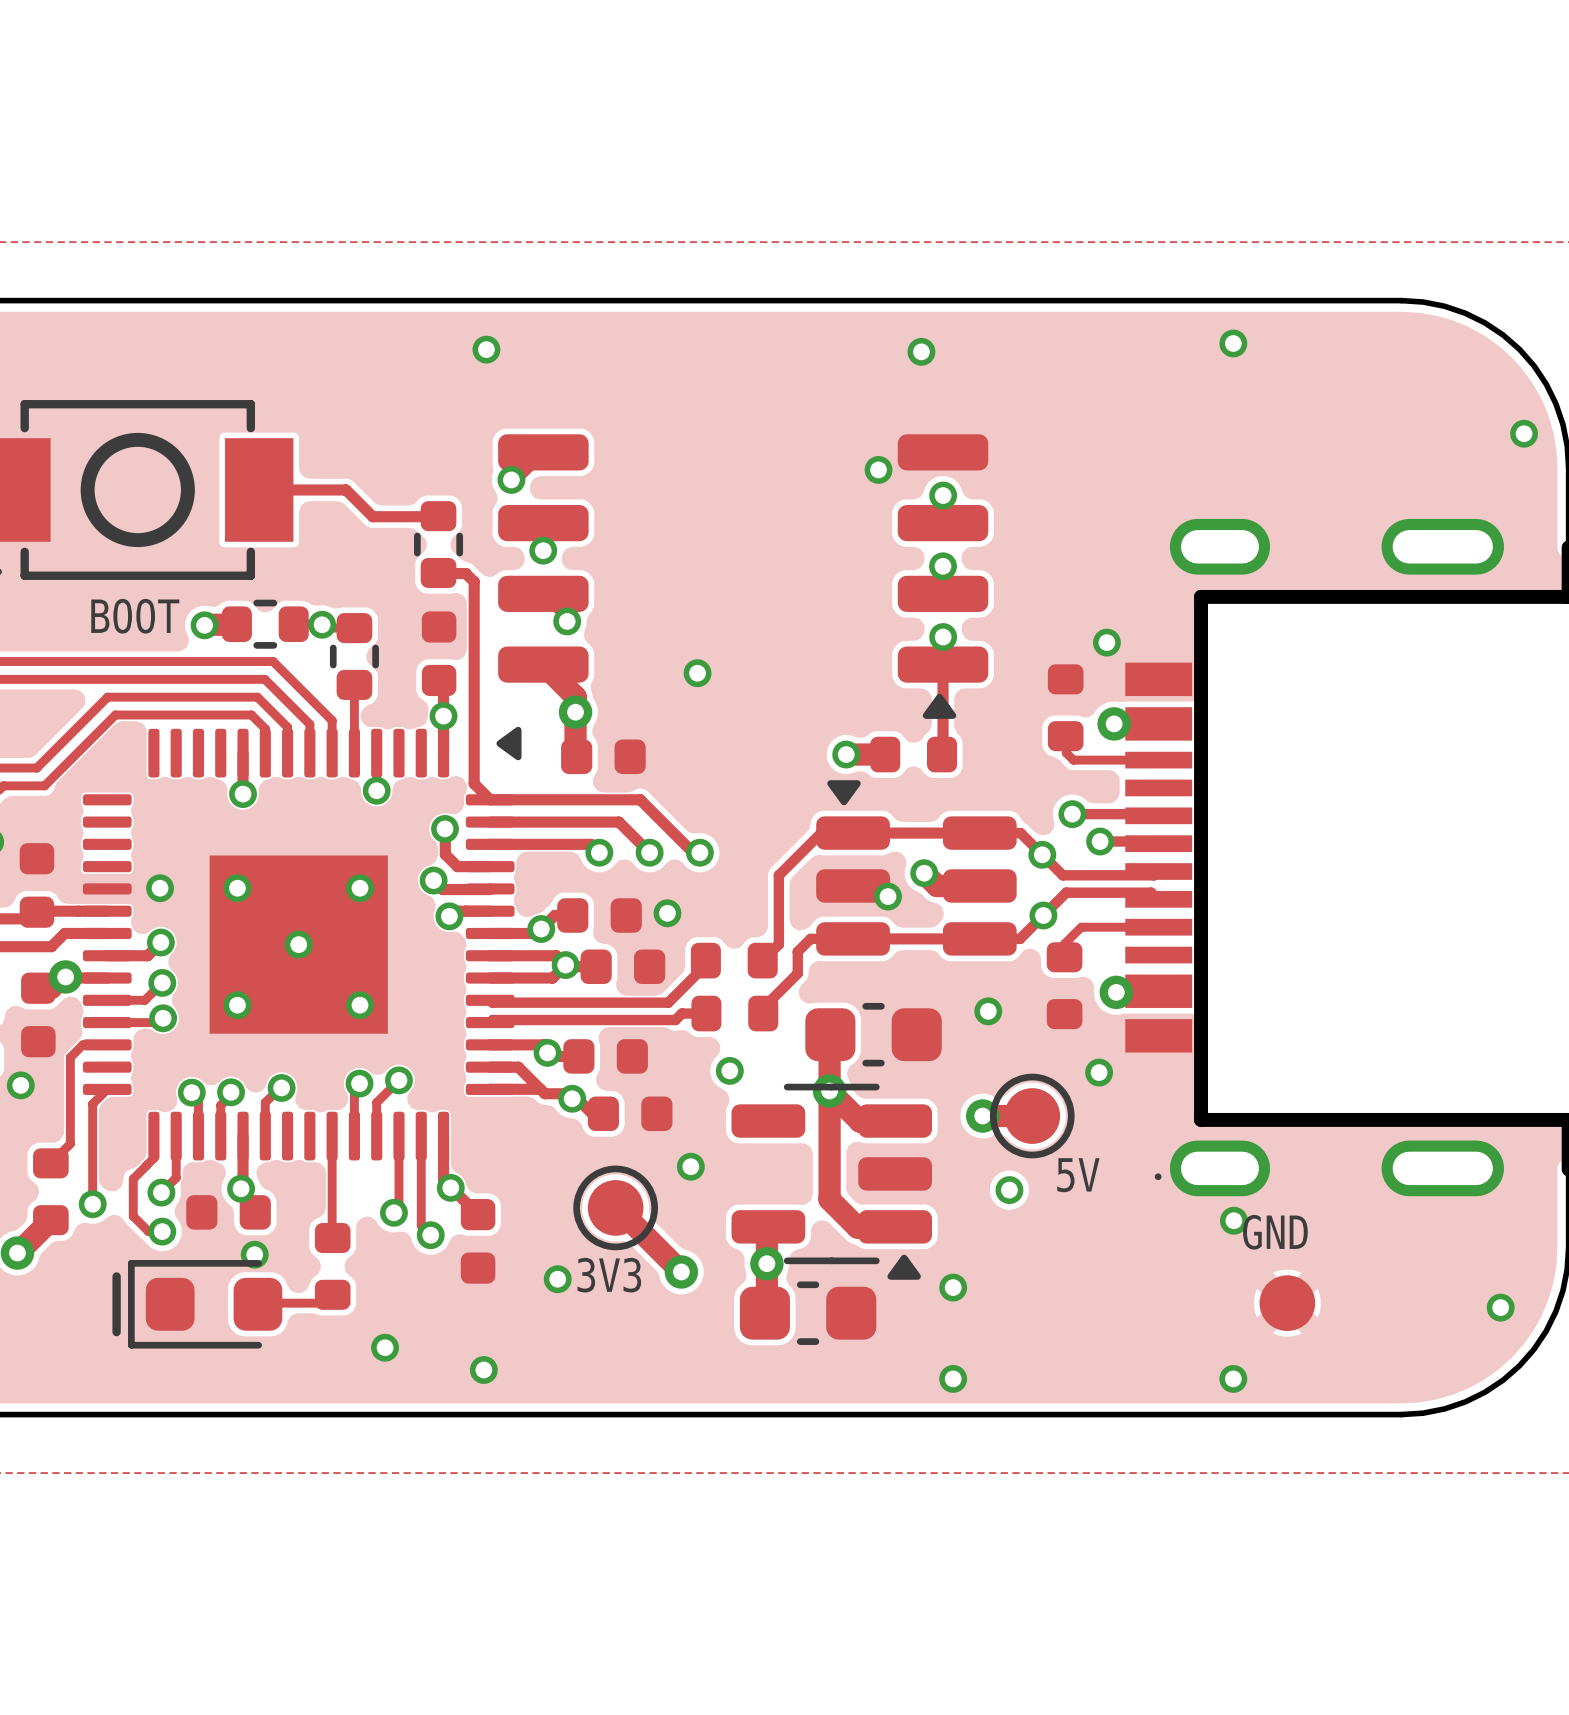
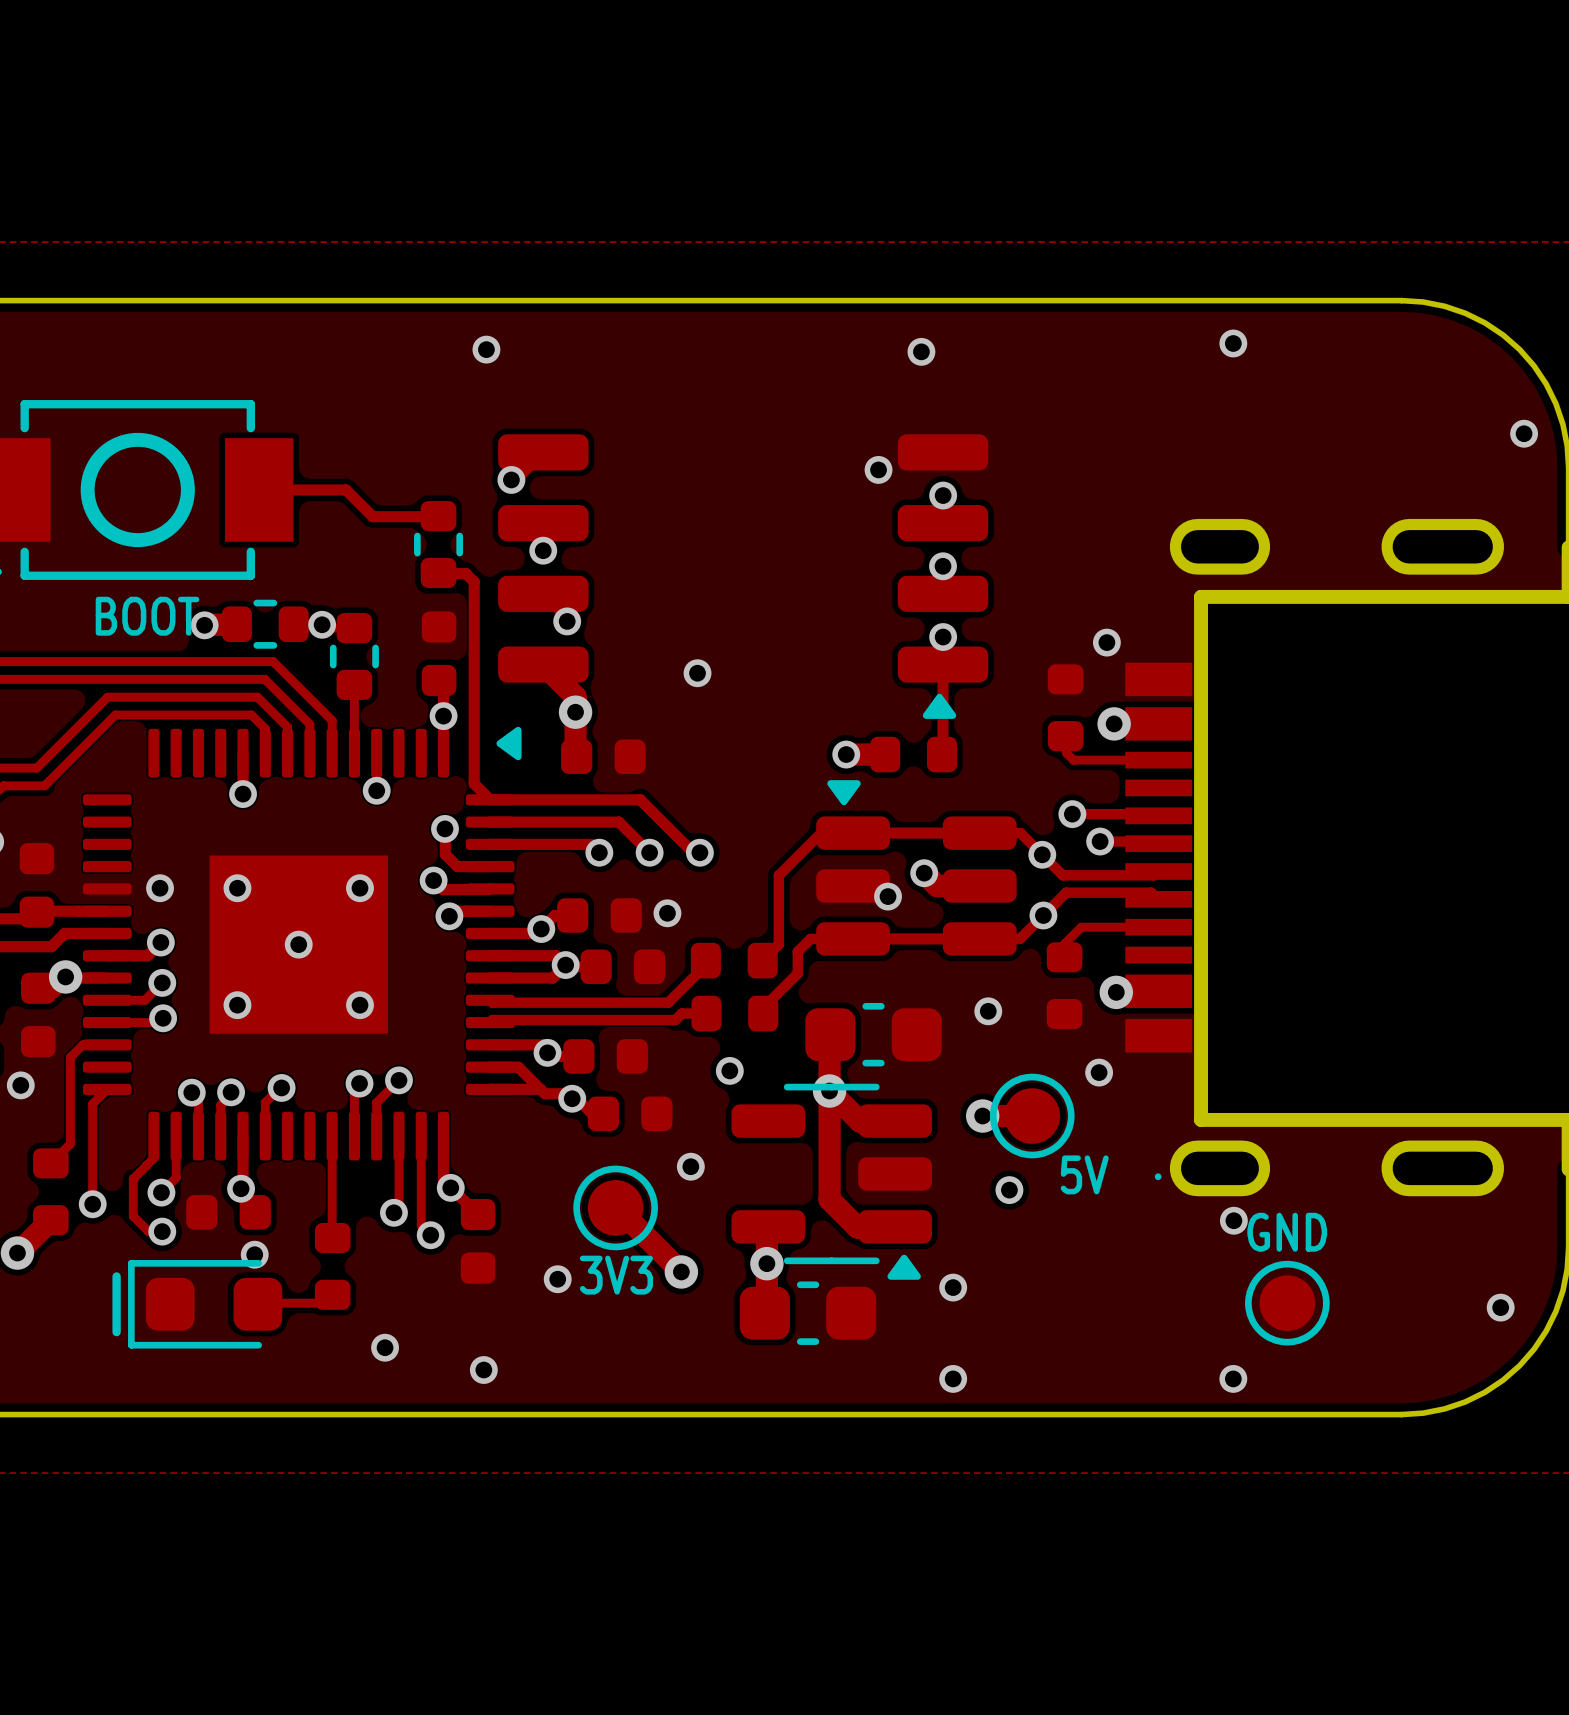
part footprint: [1259, 1275, 1316, 1332] -> [1245, 1260, 1330, 1346]

